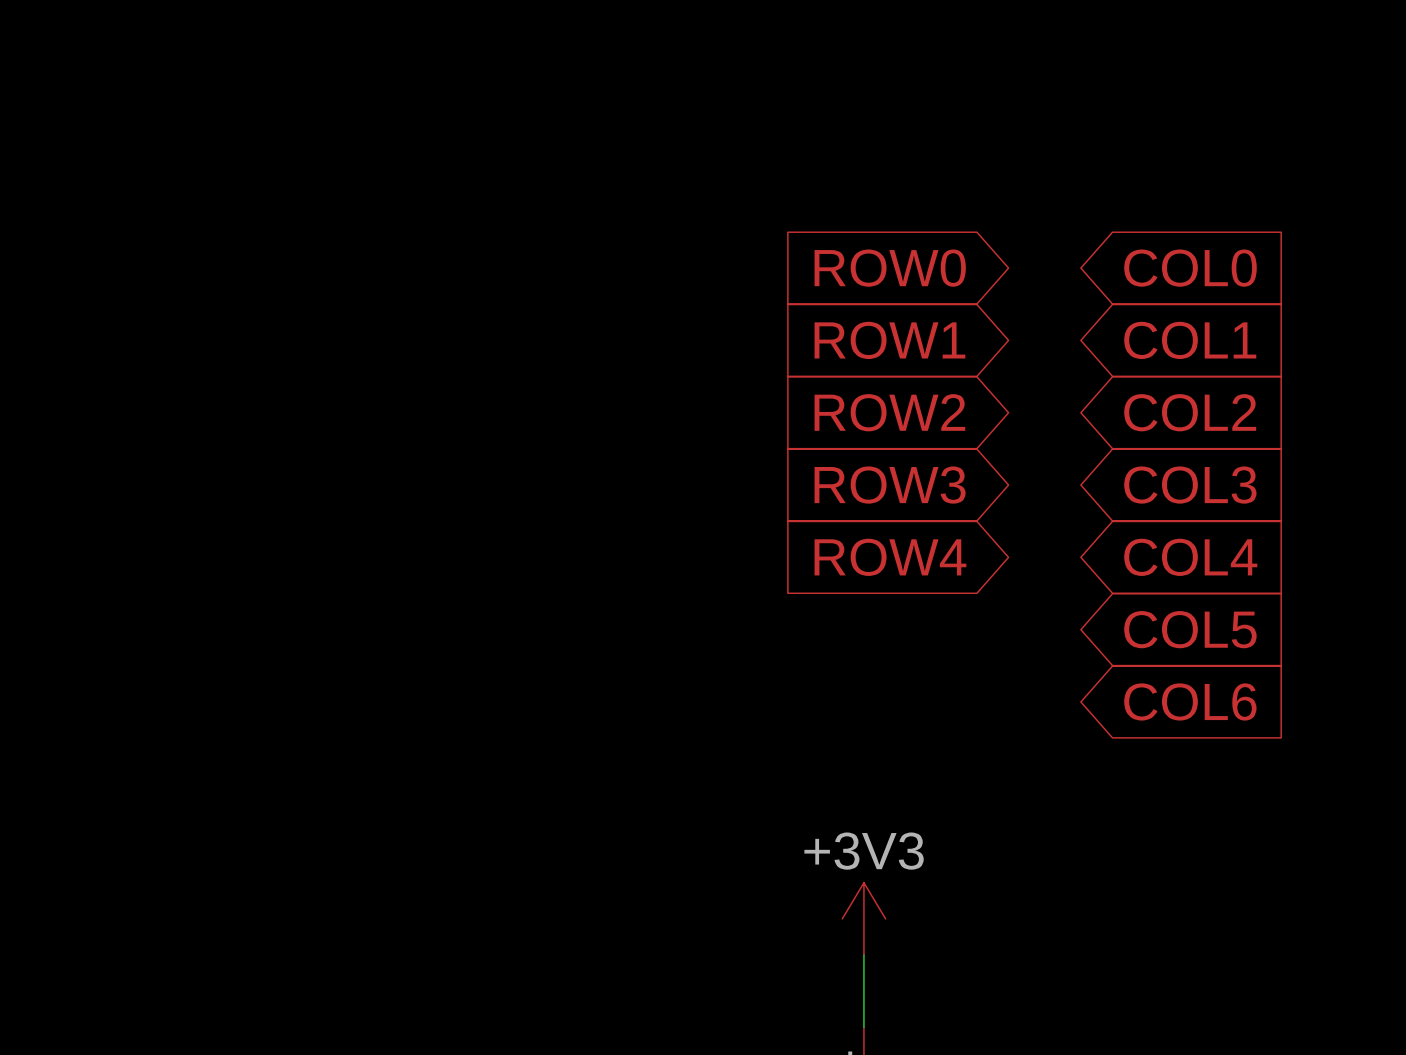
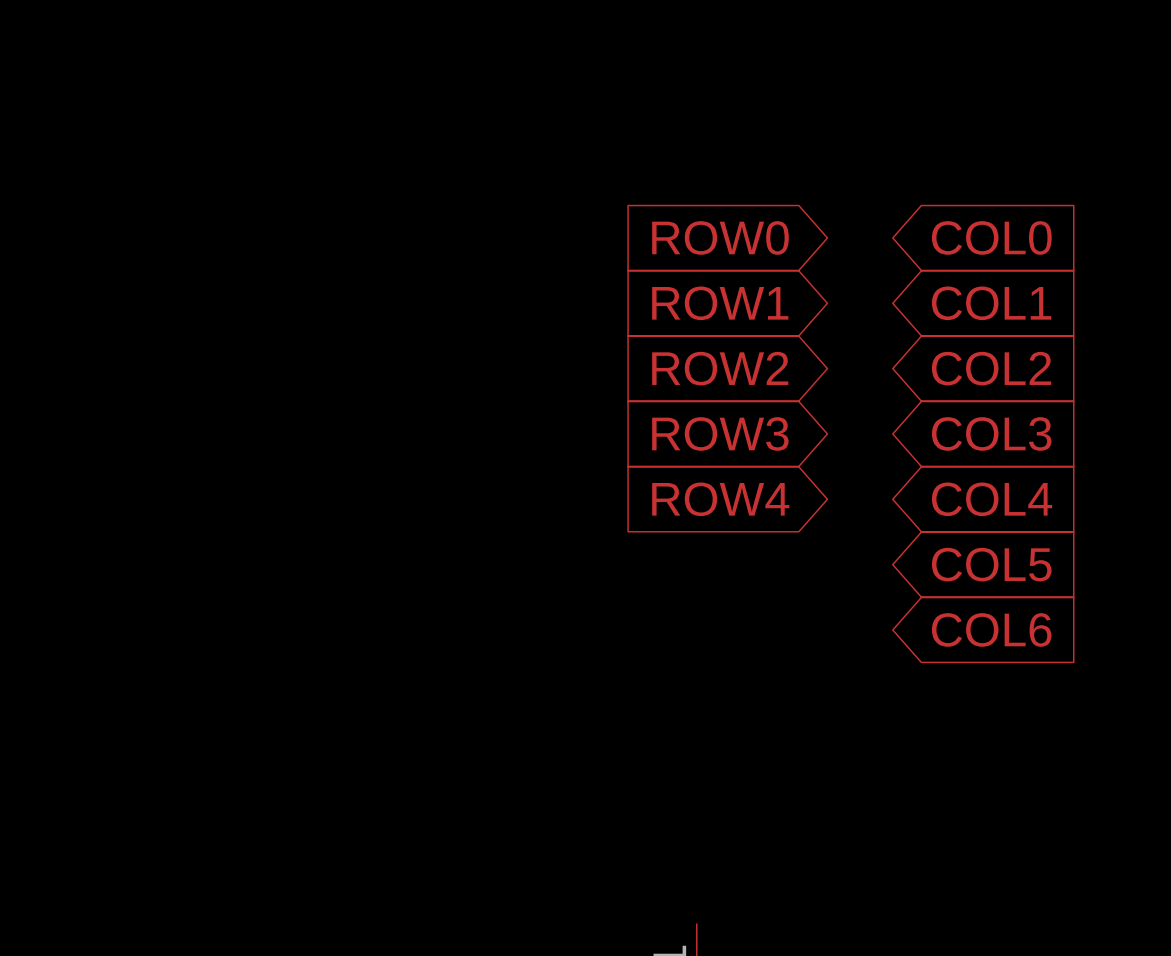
power symbol: +3V3 (863, 918) -> none
wire: (863, 955) (863, 1027) -> none

